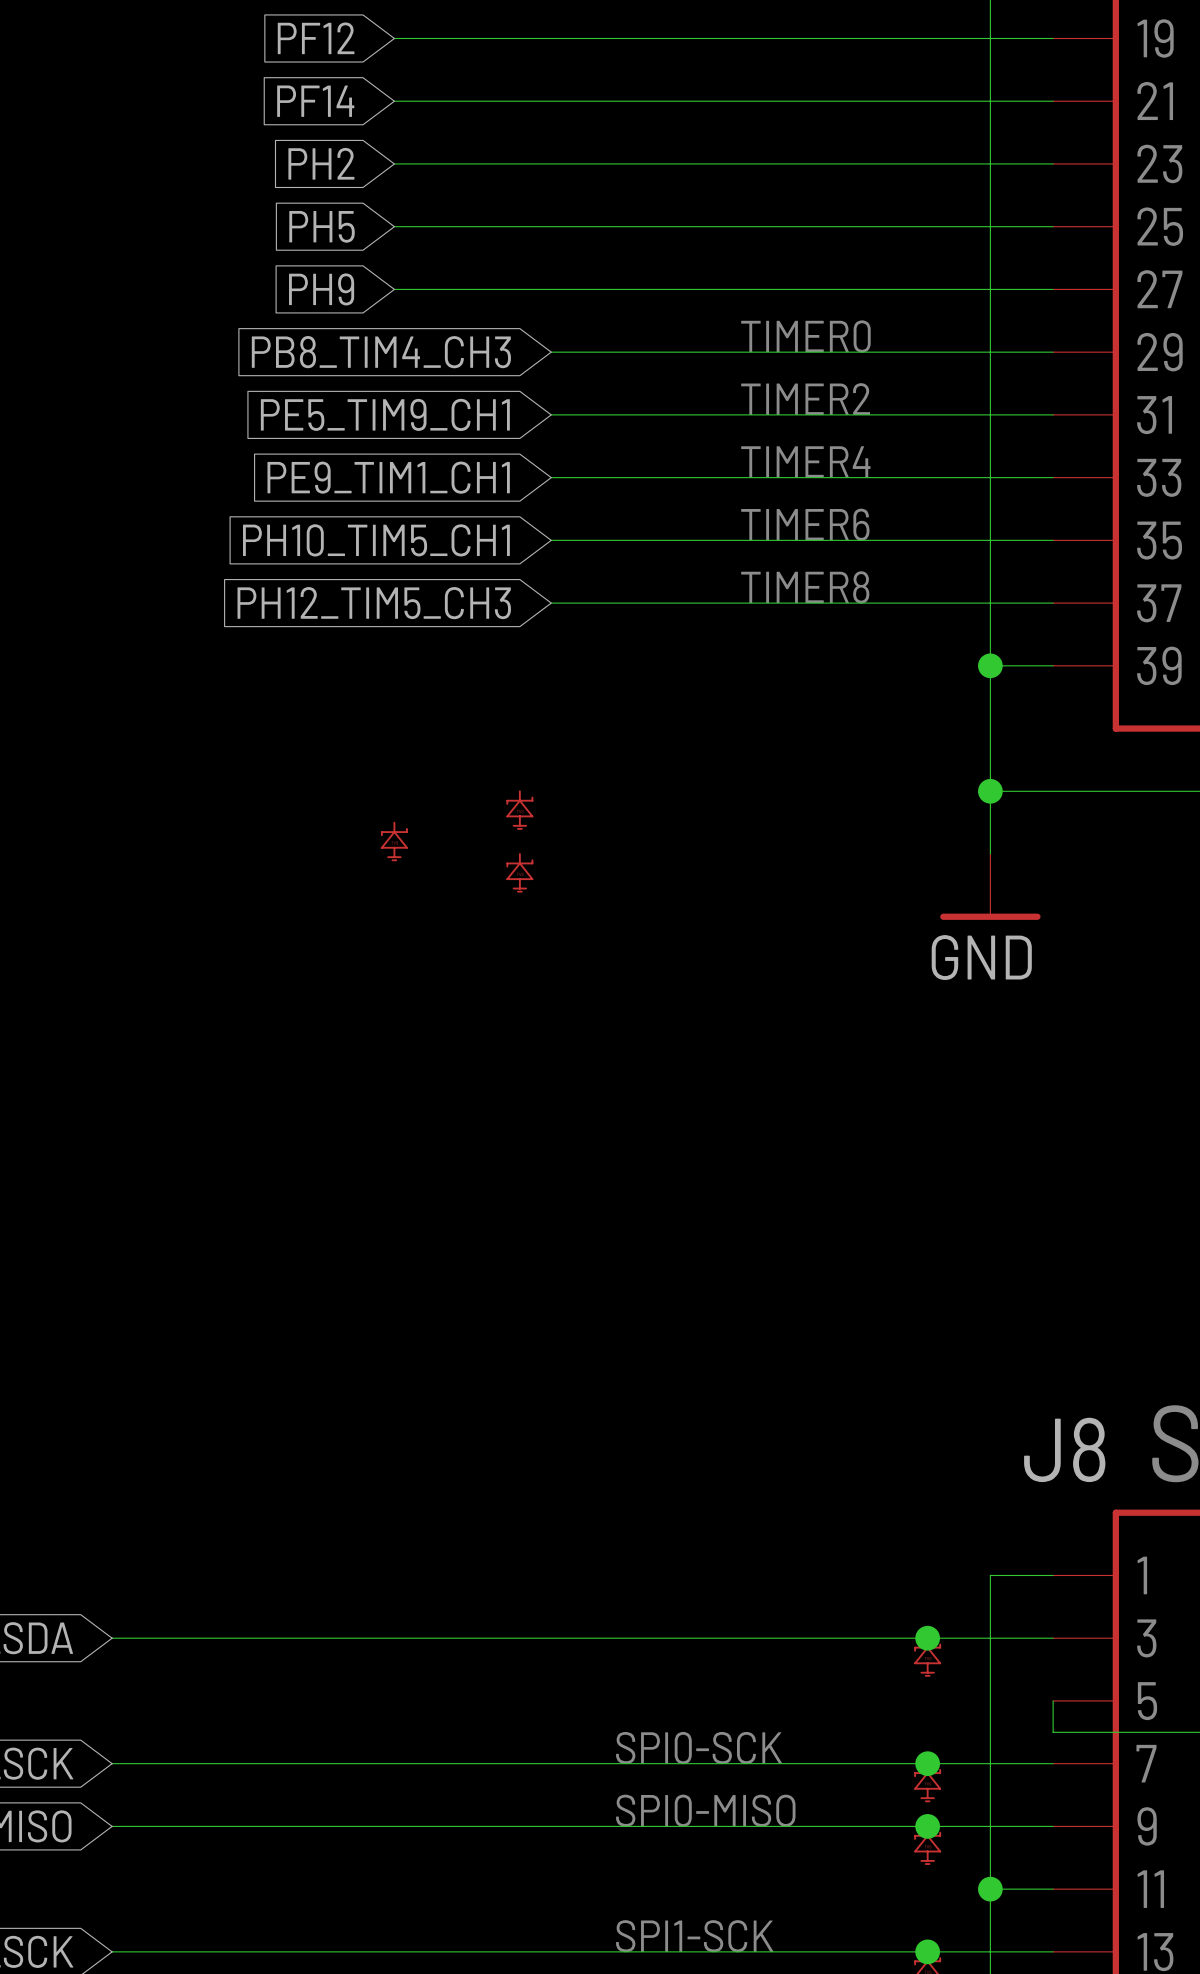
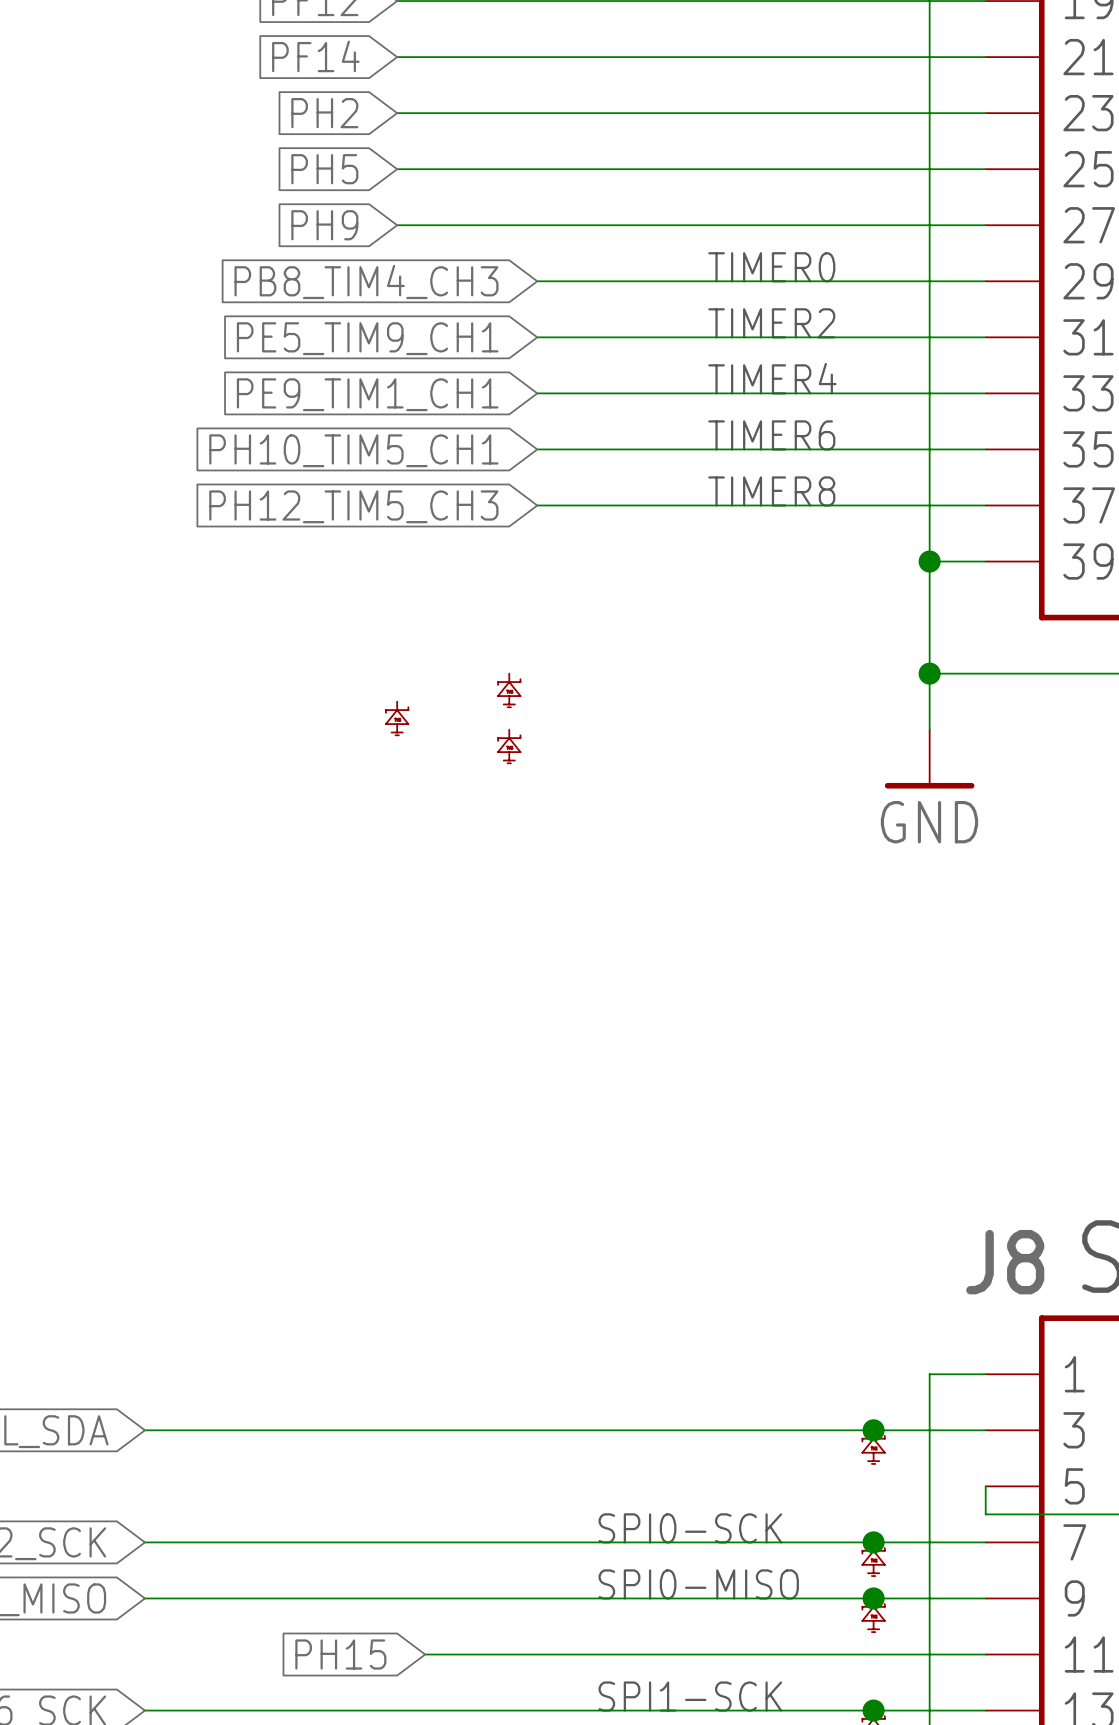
global label: none -> PH15 (340, 1654)
wire: none -> (425, 1654) (929, 1654)
junction: (990, 1889) -> none

